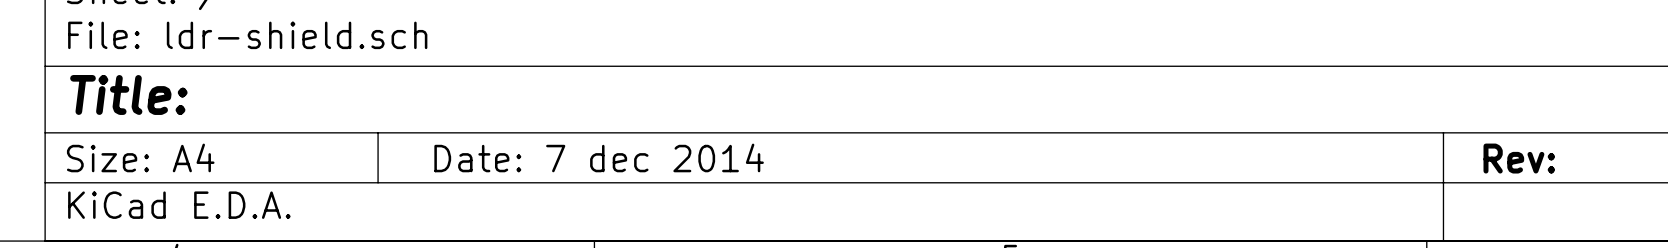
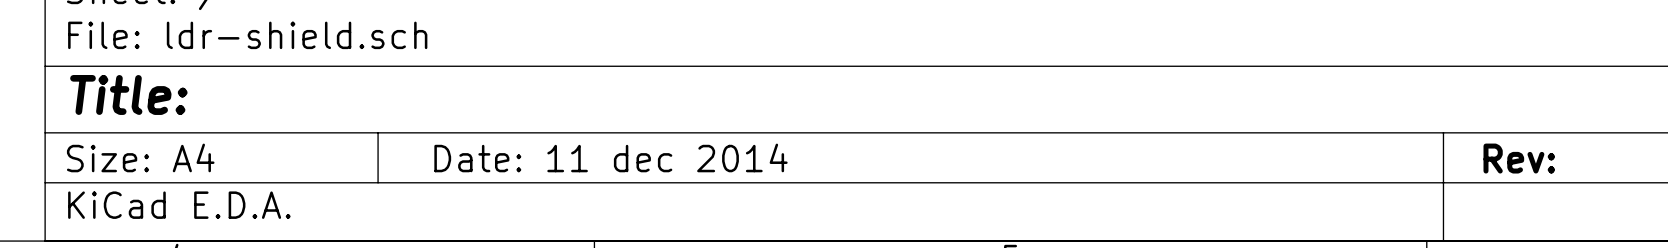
title block: Date: 7 dec 2014 (599, 157) -> Date: 11 dec 2014 (611, 157)

